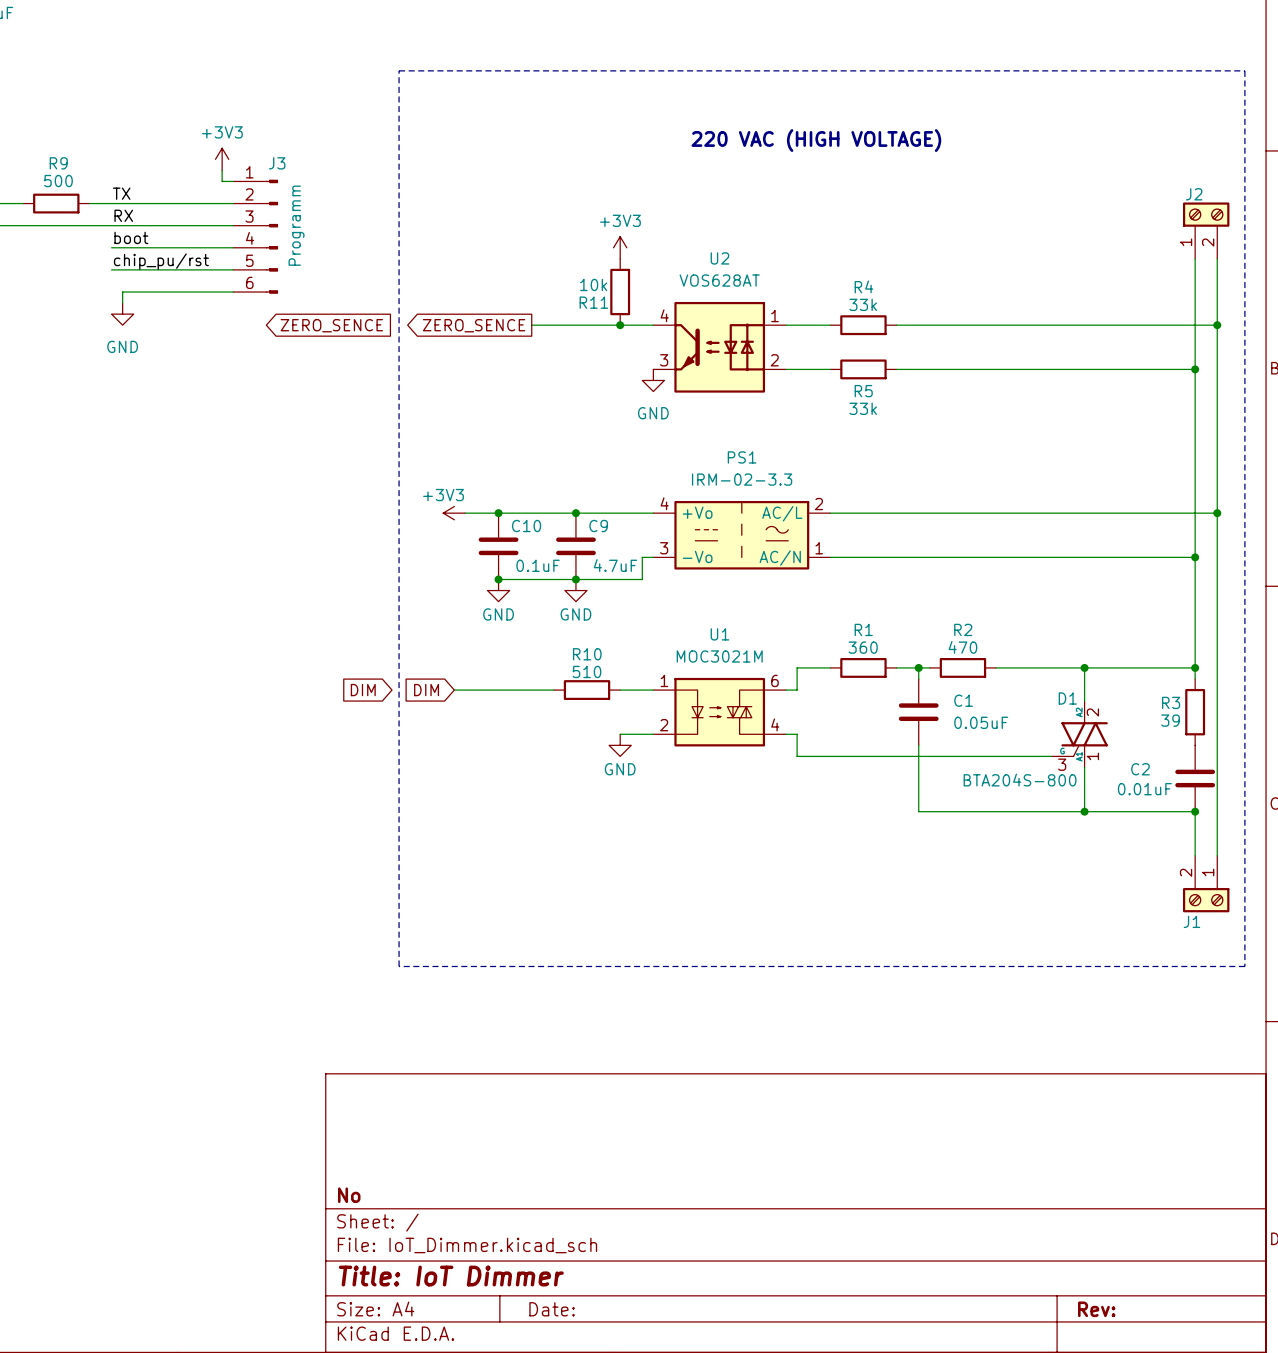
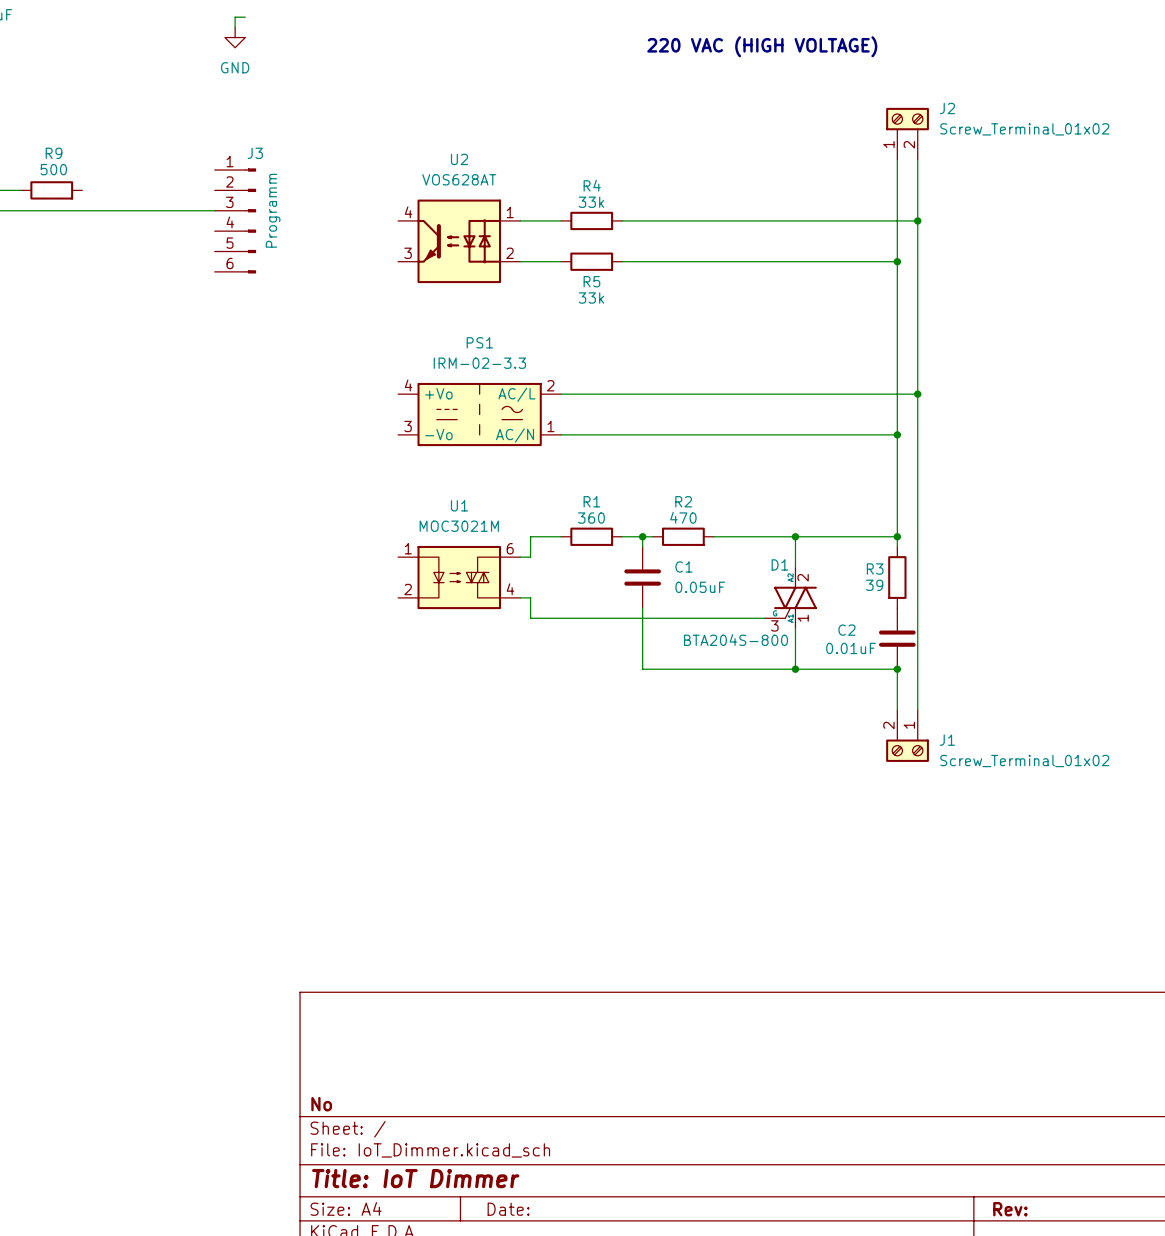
wire: none -> (245, 17) (235, 17) (235, 27)
power symbol: none -> GND (235, 37)
line: (399, 70) (1244, 70) (1244, 966) (399, 966) (399, 70) -> none
J2 value: none -> Screw_Terminal_01x02 (1024, 129)
text position: 220 VAC (HIGH VOLTAGE) (816, 140) -> 220 VAC (HIGH VOLTAGE) (762, 46)
power symbol: +3V3 (222, 159) -> none
wire: (222, 170) (222, 181) (233, 181) -> none
wire: none -> (897, 159) (897, 546)
wire: none -> (917, 159) (917, 709)
label: TX (121, 193) -> none
J2 name position: J2 (1194, 194) -> J2 (947, 108)
wire: (89, 203) (233, 203) -> none
label: RX (123, 215) -> none
J2 position: (1206, 230) -> (907, 133)
wire: none -> (520, 220) (561, 220)
wire: none -> (622, 220) (917, 220)
junction: none -> (917, 220)
label: boot (131, 237) -> none
wire: (111, 247) (233, 247) -> none
power symbol: +3V3 (620, 247) -> none
wire: (1195, 258) (1195, 679) -> none
wire: (1217, 258) (1217, 855) -> none
label: chip_pu/rst (161, 261) -> none
wire: (111, 269) (233, 269) -> none
wire: none -> (520, 261) (561, 261)
wire: none -> (622, 261) (897, 261)
junction: none -> (897, 261)
wire: (233, 292) (122, 292) (122, 303) -> none
R11: 10k (620, 292) -> none
power symbol: GND (122, 314) -> none
global label: ZERO_SENCE (331, 325) -> none
global label: ZERO_SENCE (474, 325) -> none
wire: (531, 325) (653, 325) -> none
junction: (620, 325) -> none
wire: (786, 325) (830, 325) -> none
R4 position: (863, 325) -> (591, 220)
wire: (896, 325) (1217, 325) -> none
junction: (1217, 325) -> none
U2 position: (719, 347) -> (459, 241)
wire: (786, 369) (830, 369) -> none
R5 position: (863, 369) -> (591, 261)
wire: (896, 369) (1195, 369) -> none
junction: (1195, 369) -> none
power symbol: GND (653, 380) -> none
wire: none -> (561, 394) (917, 394)
junction: none -> (917, 394)
wire: none -> (561, 434) (897, 434)
junction: none -> (897, 434)
power symbol: +3V3 (454, 513) -> none
wire: (465, 513) (653, 513) -> none
junction: (498, 513) -> none
junction: (575, 513) -> none
wire: (830, 513) (1217, 513) -> none
junction: (1217, 513) -> none
PS1 position: (741, 535) -> (479, 414)
C10: 0.1uF (498, 546) -> none
C9: 4.7uF (575, 546) -> none
wire: (653, 557) (642, 557) (642, 579) (609, 579) -> none
wire: (830, 557) (1195, 557) -> none
junction: (1195, 557) -> none
wire: (498, 579) (575, 579) -> (520, 557) (530, 557) (530, 536)
junction: (498, 579) -> none
junction: (575, 579) -> none
wire: none -> (642, 536) (642, 546)
junction: none -> (642, 536)
wire: none -> (713, 536) (897, 536)
wire: none -> (795, 536) (795, 567)
junction: none -> (795, 536)
junction: none -> (897, 536)
power symbol: GND (498, 590) -> none
power symbol: GND (575, 590) -> none
wire: none -> (642, 608) (642, 669) (897, 669) (897, 709)
wire: (797, 667) (797, 690) (786, 690) -> (734, 618) (530, 618) (530, 597) (520, 597)
R1 position: (863, 667) -> (591, 536)
wire: (896, 667) (929, 667) -> none
wire: (918, 667) (918, 679) -> none
junction: (918, 667) -> none
R2 position: (962, 667) -> (683, 536)
wire: (996, 667) (1195, 667) -> none
wire: (1084, 667) (1084, 701) -> none
junction: (1084, 667) -> none
junction: (1195, 667) -> none
wire: none -> (795, 628) (795, 669)
global label: DIM (363, 690) -> none
global label: DIM (426, 690) -> none
wire: (454, 690) (553, 690) -> none
R10: 510 (587, 690) -> none
wire: (620, 690) (653, 690) -> (622, 536) (652, 536)
U1 position: (719, 712) -> (459, 577)
C1 position: (918, 712) -> (642, 577)
R3 position: (1195, 712) -> (897, 577)
junction: none -> (795, 669)
junction: none -> (897, 669)
wire: (620, 734) (653, 734) -> none
wire: (786, 734) (797, 734) (797, 756) (1051, 756) -> none
D1 position: (1079, 734) -> (790, 597)
power symbol: GND (620, 745) -> none
wire: (918, 745) (918, 811) (1195, 811) (1195, 855) -> none
wire: (1084, 767) (1084, 811) -> none
C2 position: (1195, 778) -> (897, 638)
junction: (1084, 811) -> none
junction: (1195, 811) -> none
J1 value: none -> Screw_Terminal_01x02 (1024, 761)
J1 position: (1206, 884) -> (907, 735)
J1 name position: J1 (1191, 921) -> J1 (947, 740)

